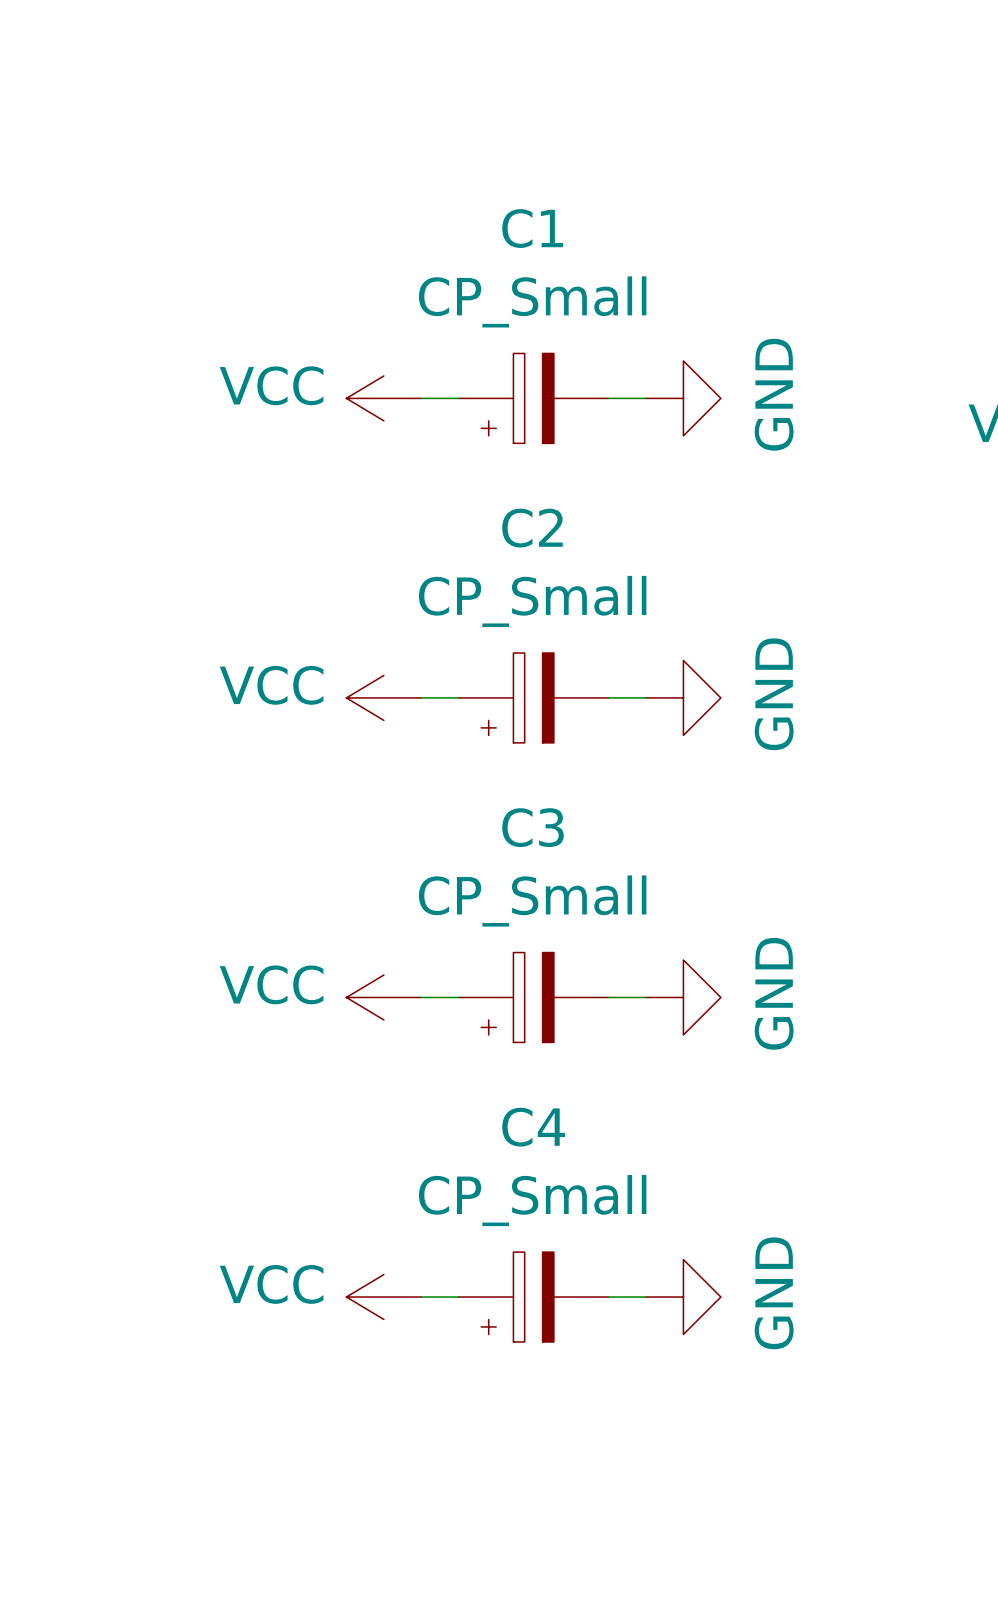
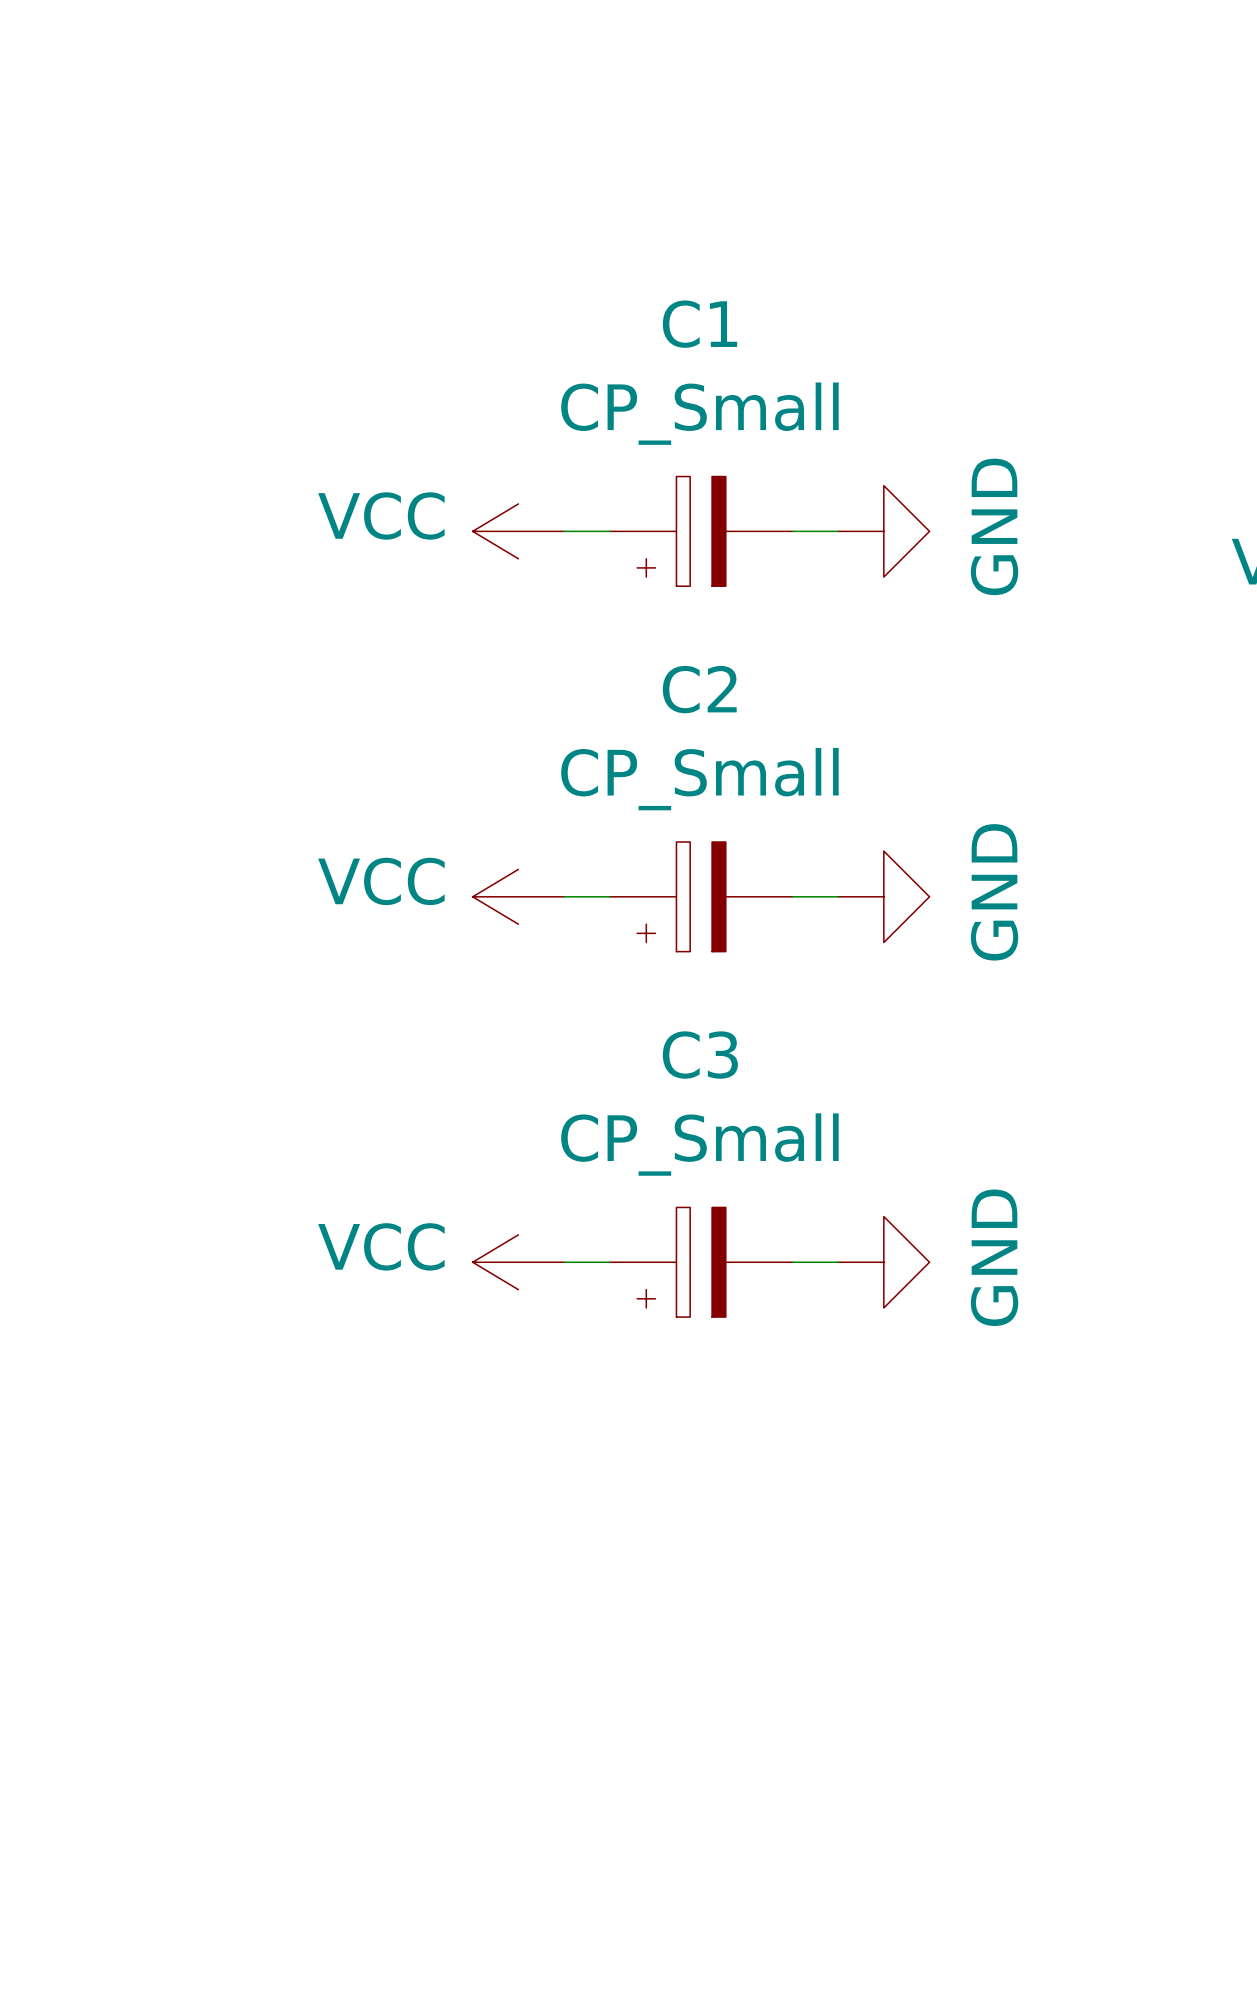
power symbol: VCC (383, 1297) -> none
wire: (421, 1297) (458, 1297) -> none
C4: CP_Small (533, 1297) -> none
wire: (608, 1297) (645, 1297) -> none
power symbol: GND (683, 1297) -> none

